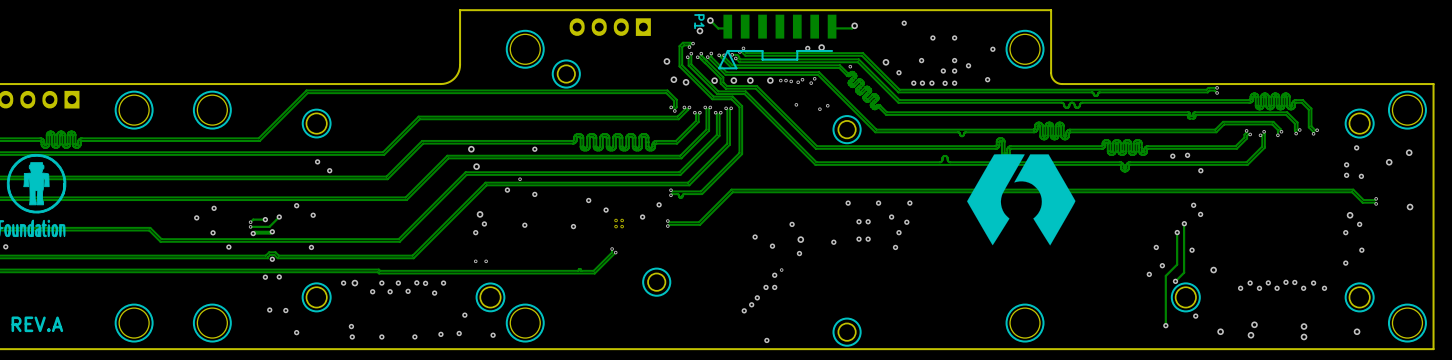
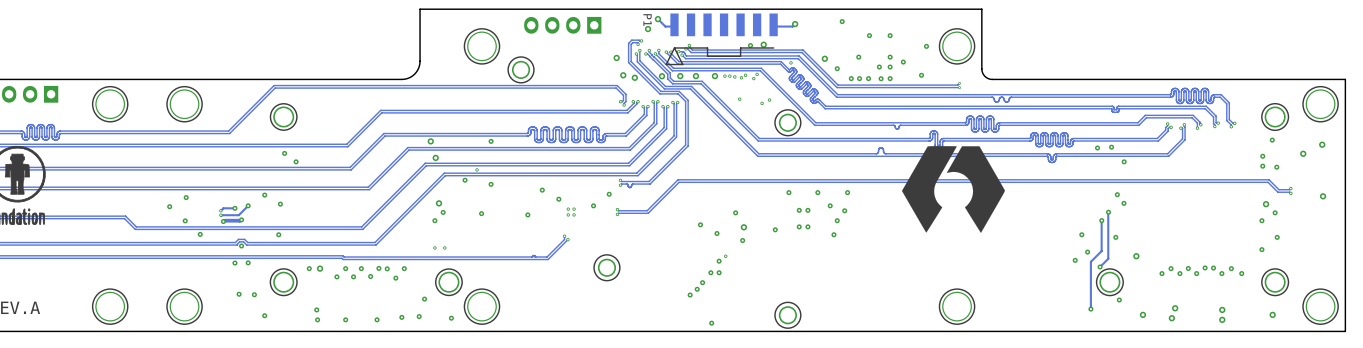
track: (1217, 87) (1208, 87) (1206, 89) (899, 89) -> (959, 83) (957, 85) (837, 84)
via: (1217, 87) -> none
via: none -> (959, 83)
track: (898, 92) (1092, 92) (1095, 95) (1099, 92) (1207, 92) (1214, 90) (1217, 92) -> (836, 87) (959, 87)
via: none -> (959, 87)
via: (1217, 92) -> none

